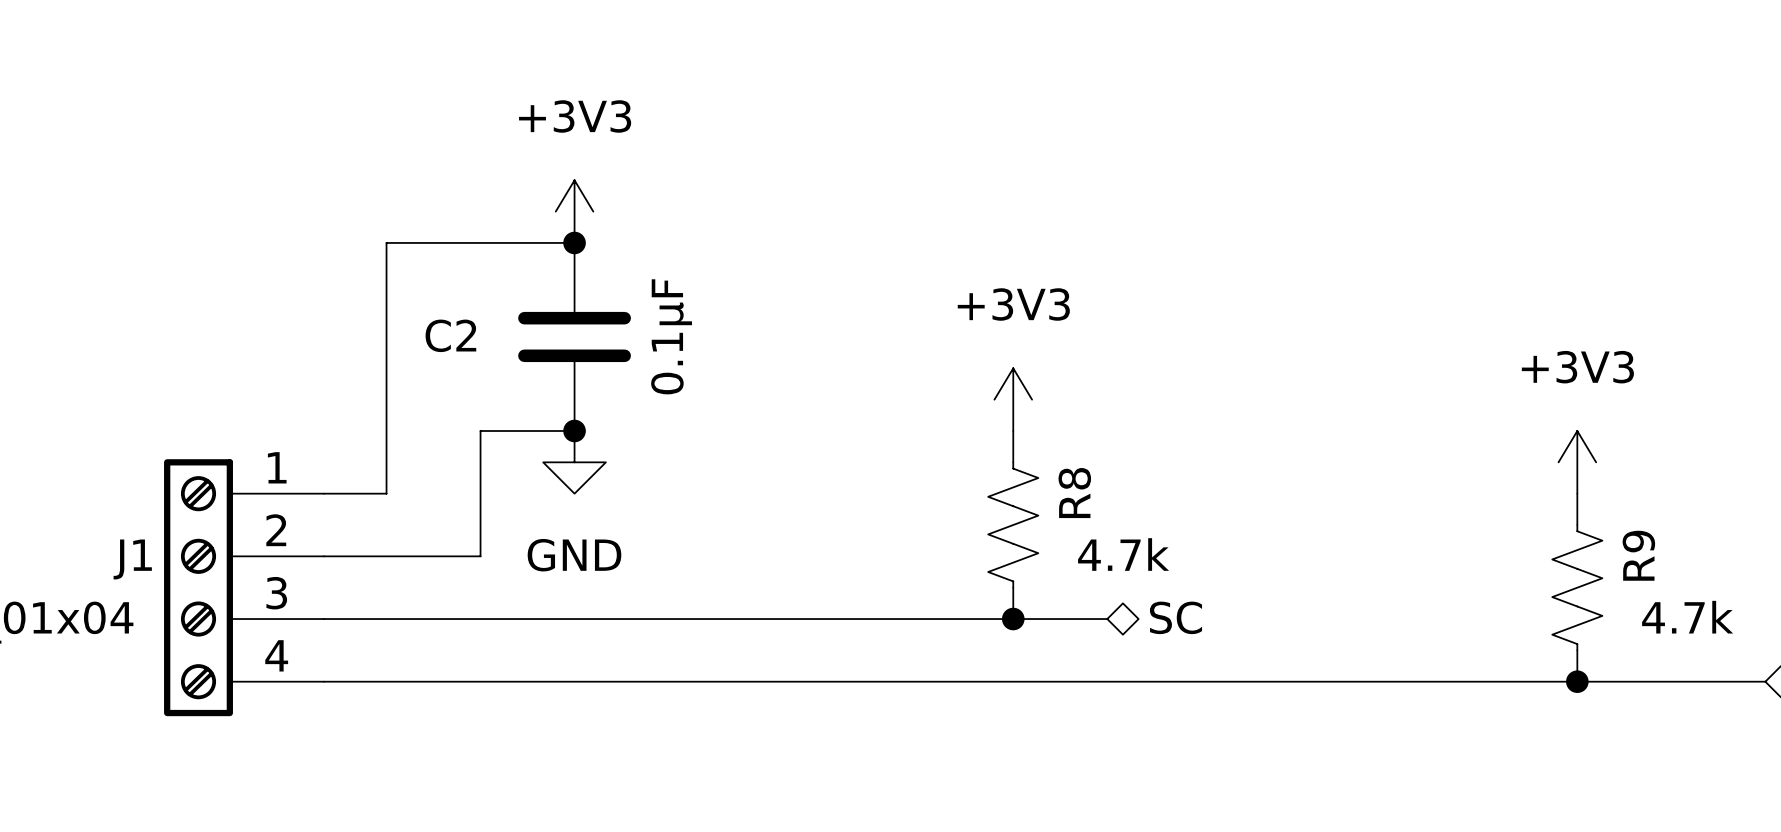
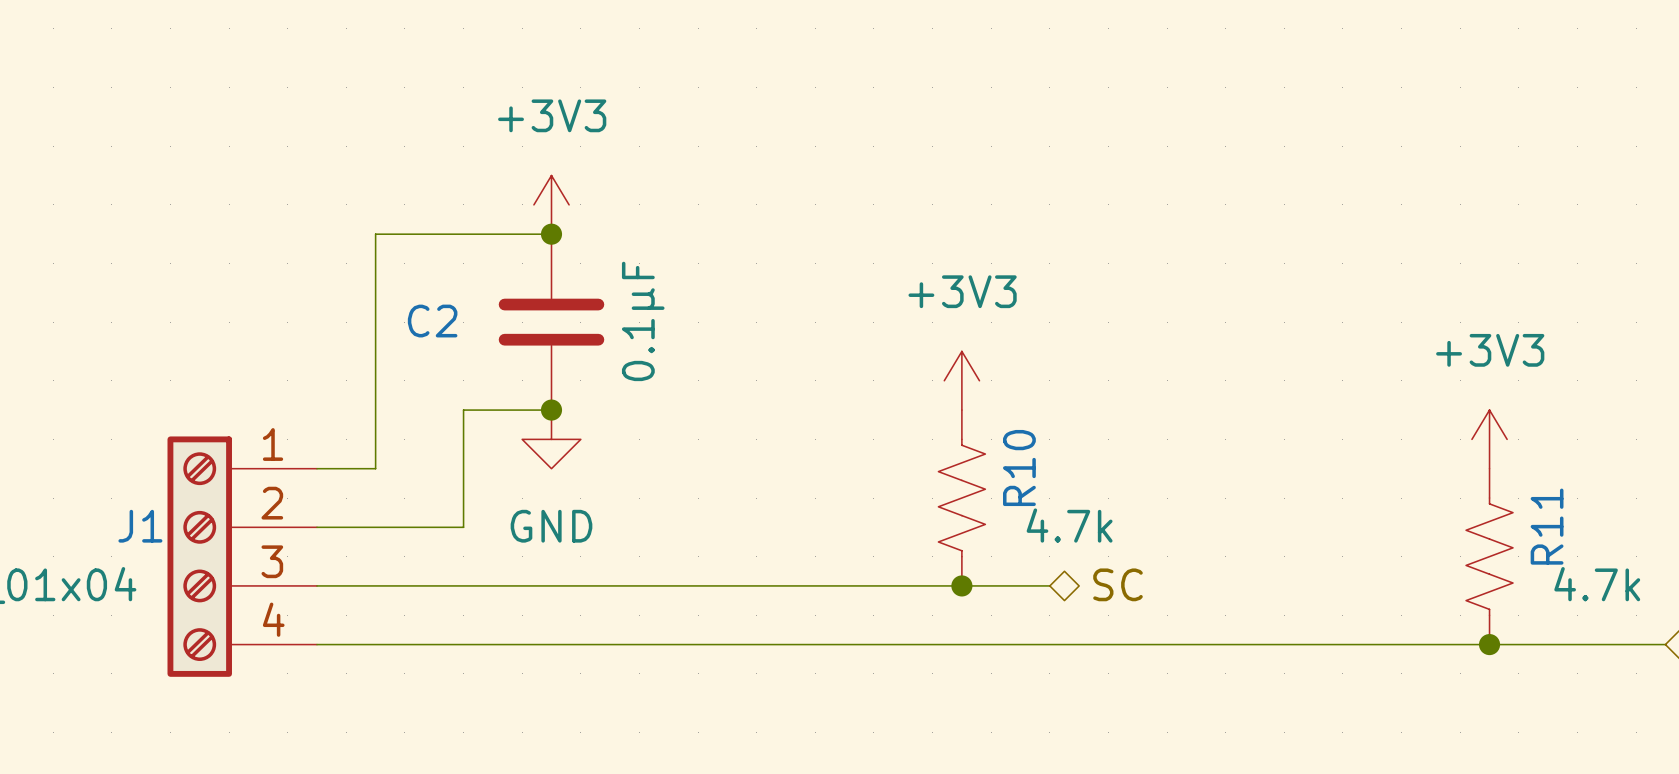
R8 name: R8 (1074, 493) -> R10 (1019, 467)
R9 name: R9 (1638, 555) -> R11 (1547, 526)

